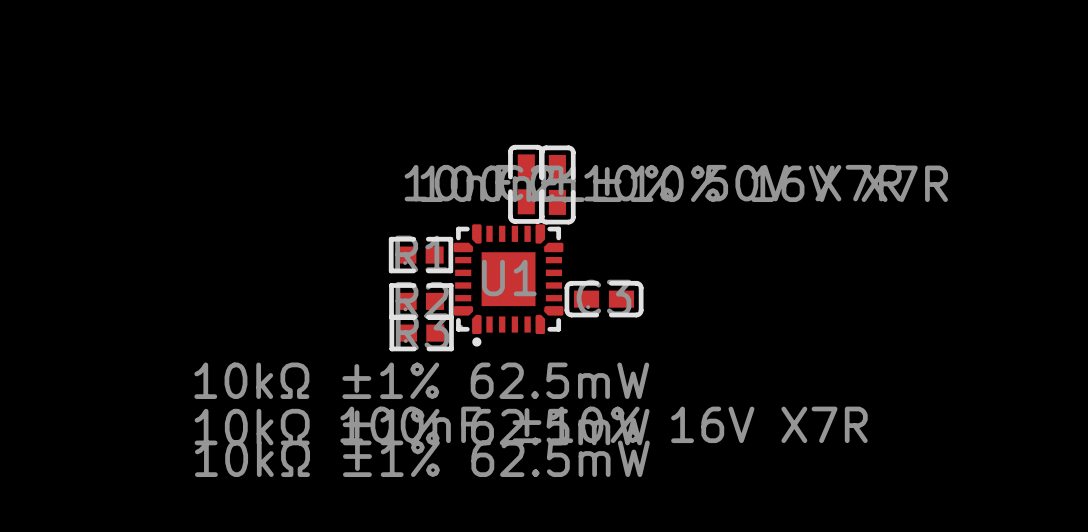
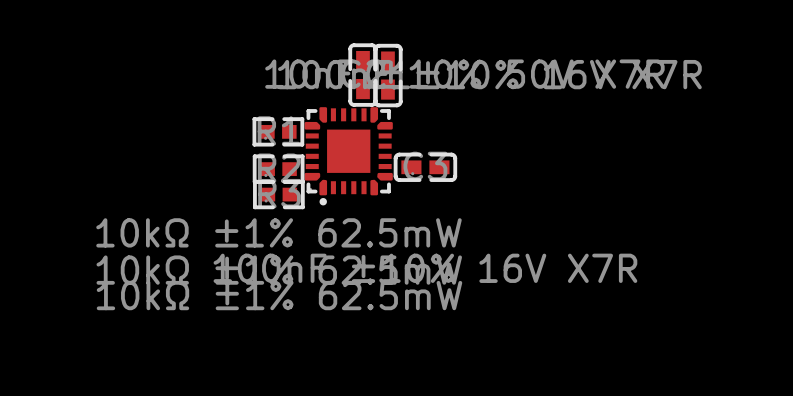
U1 name: U1 (509, 277) -> none

